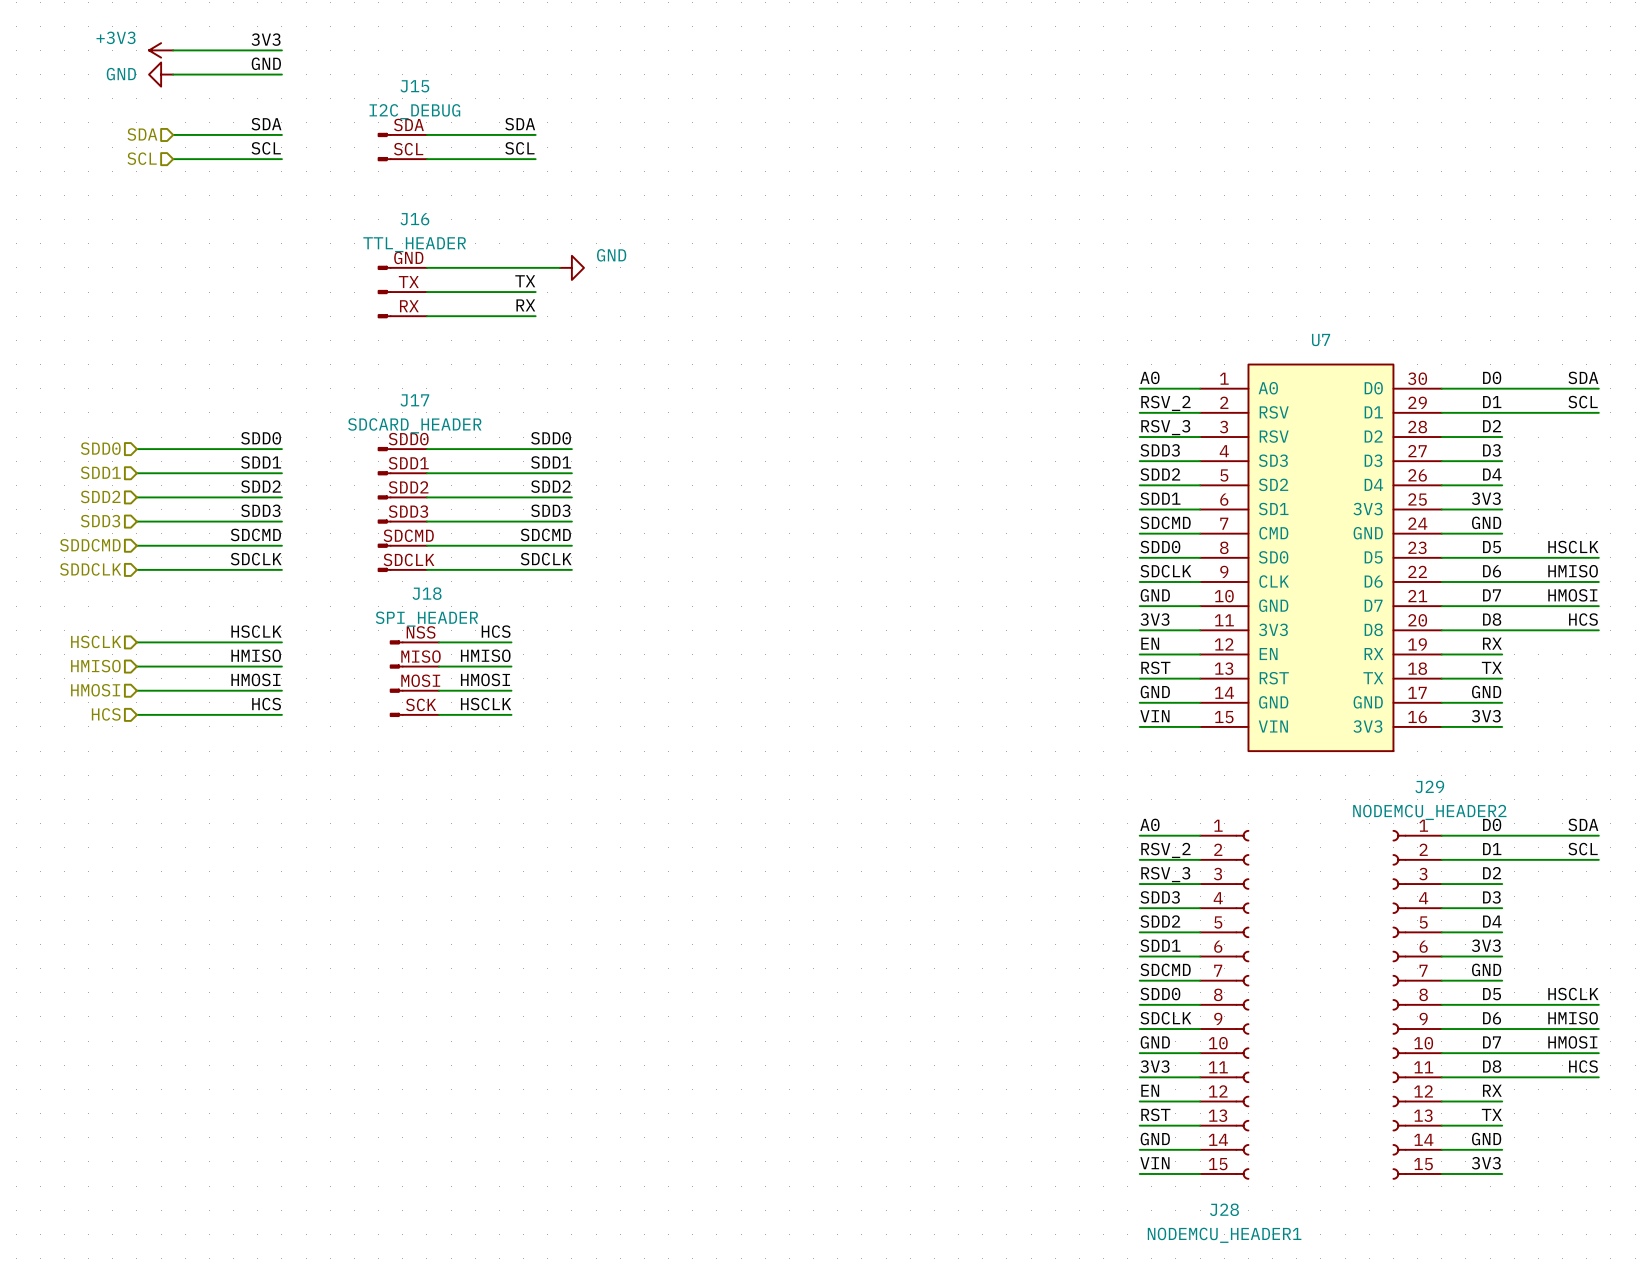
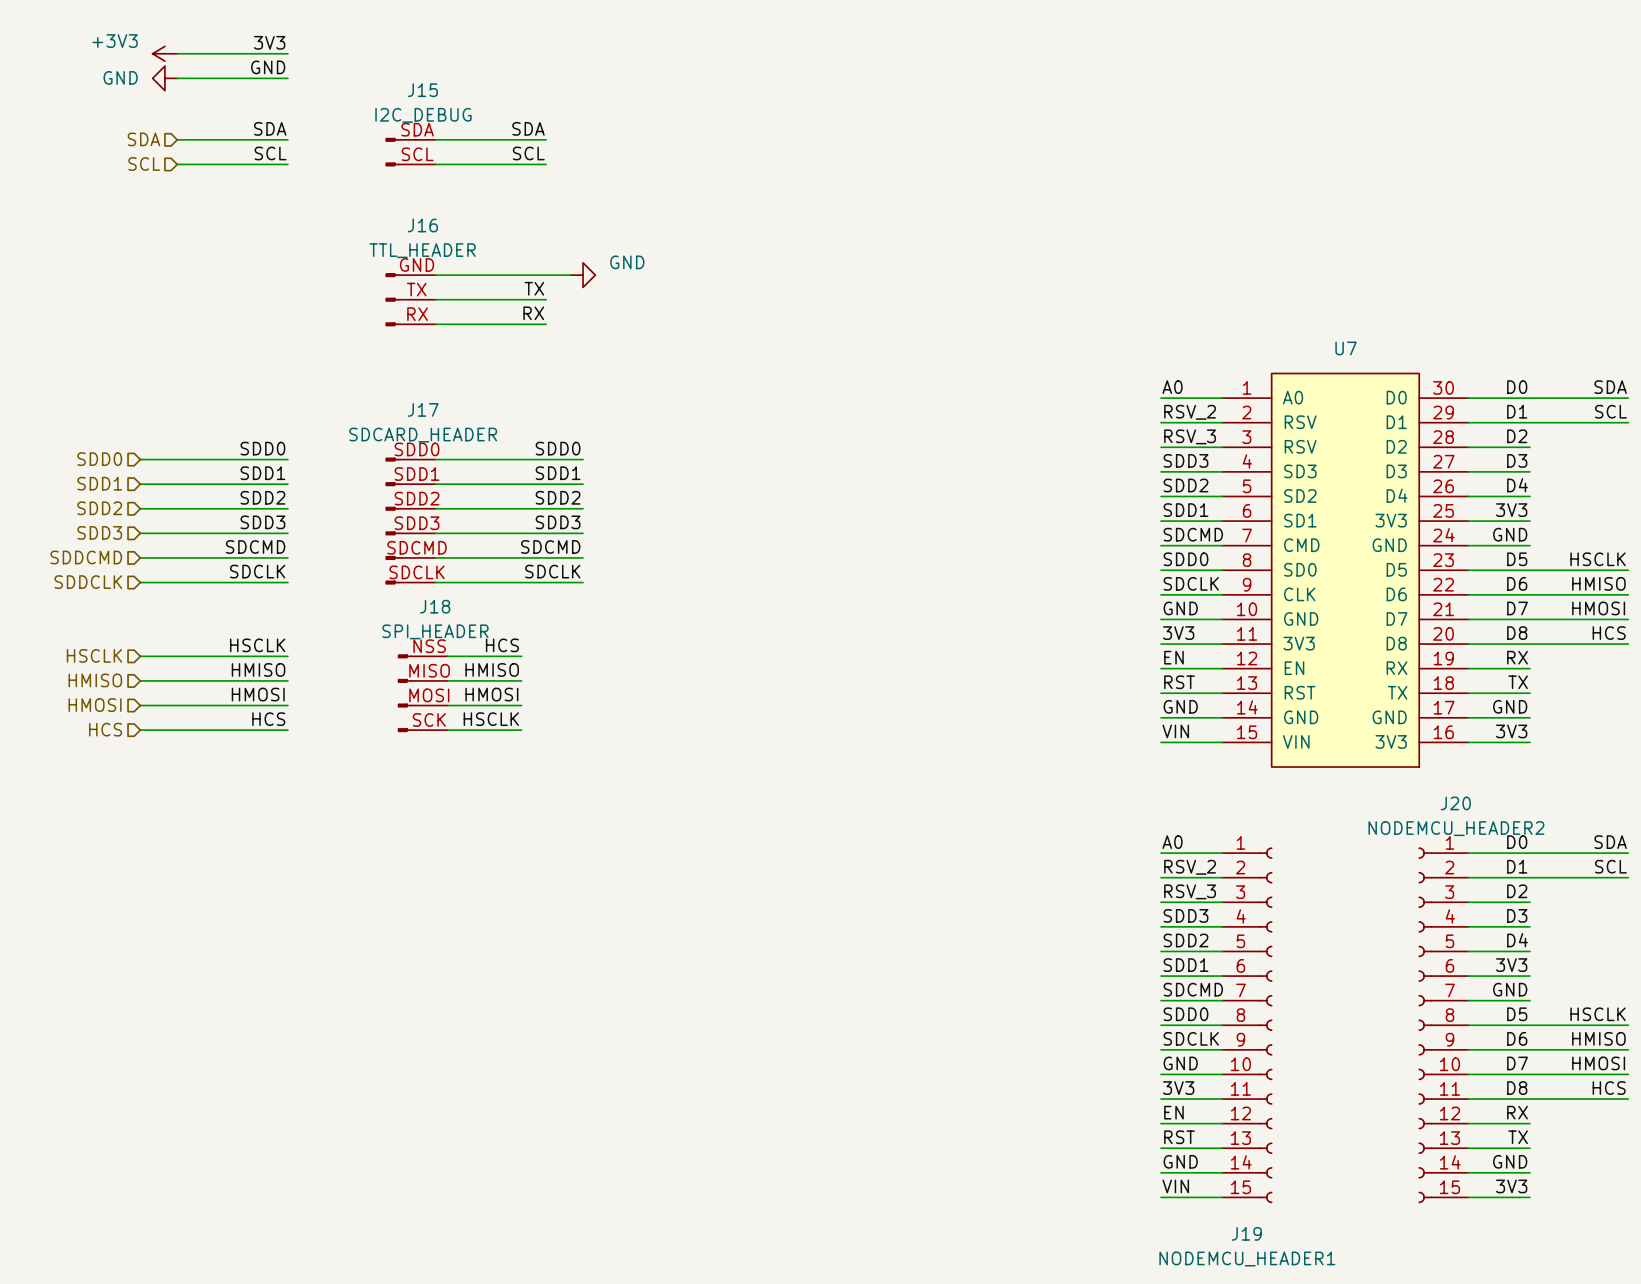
J29 name: J29 (1429, 786) -> J20 (1455, 803)
J28 name: J28 (1224, 1209) -> J19 (1246, 1233)

